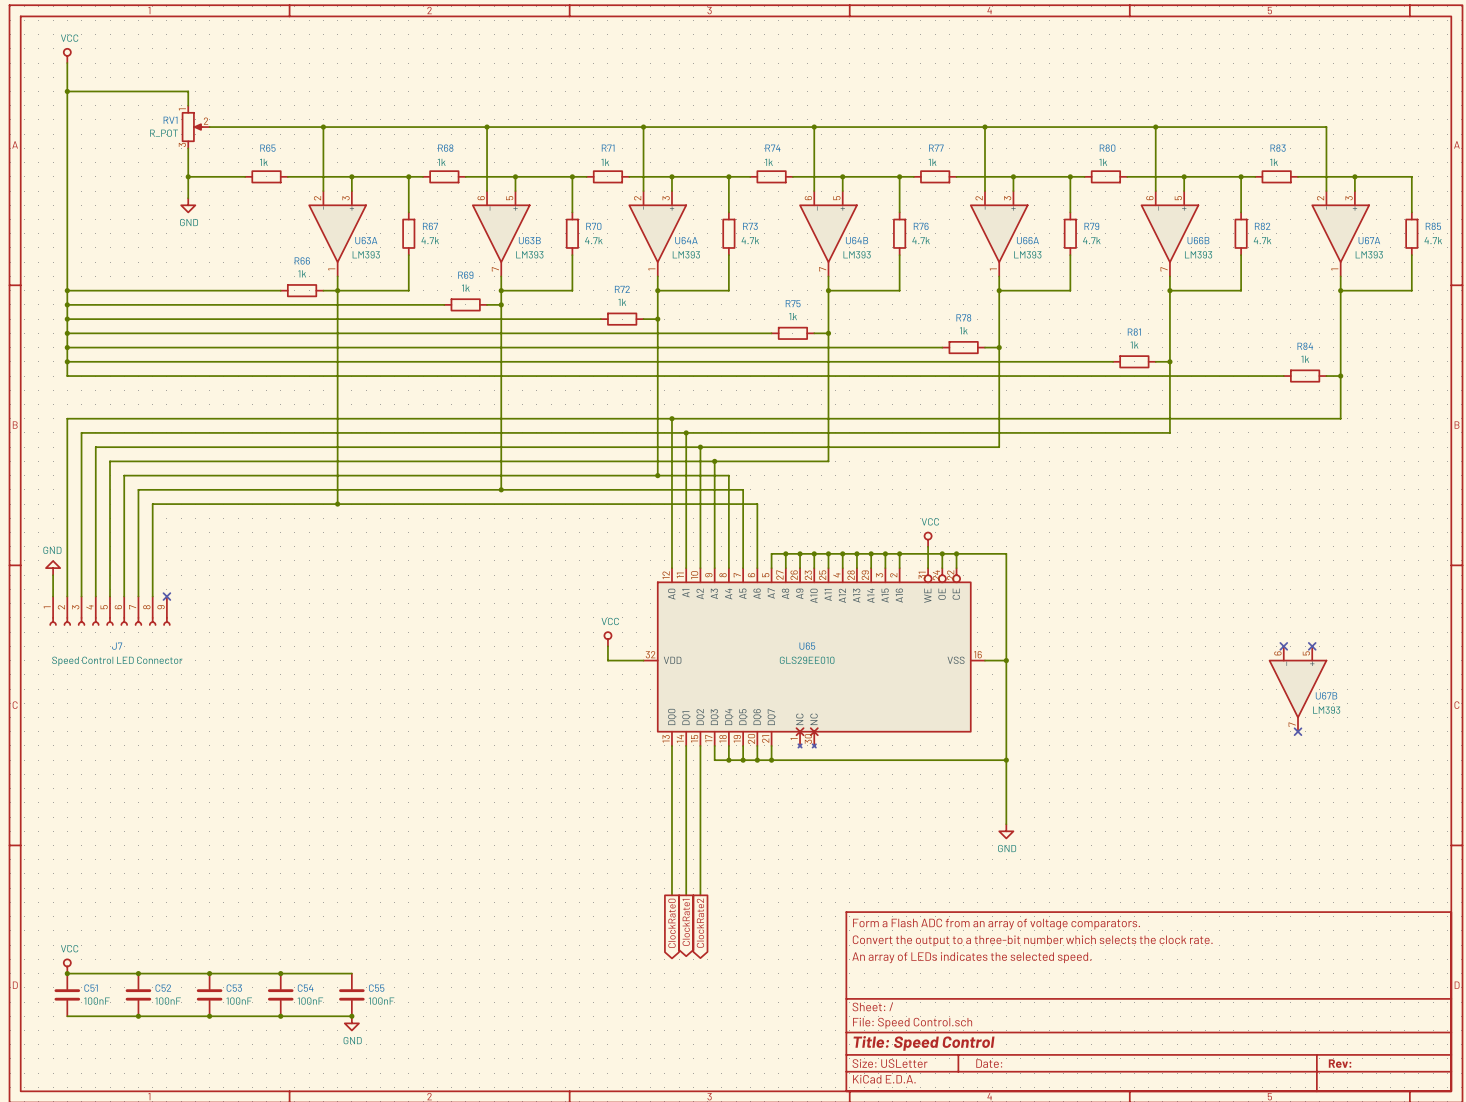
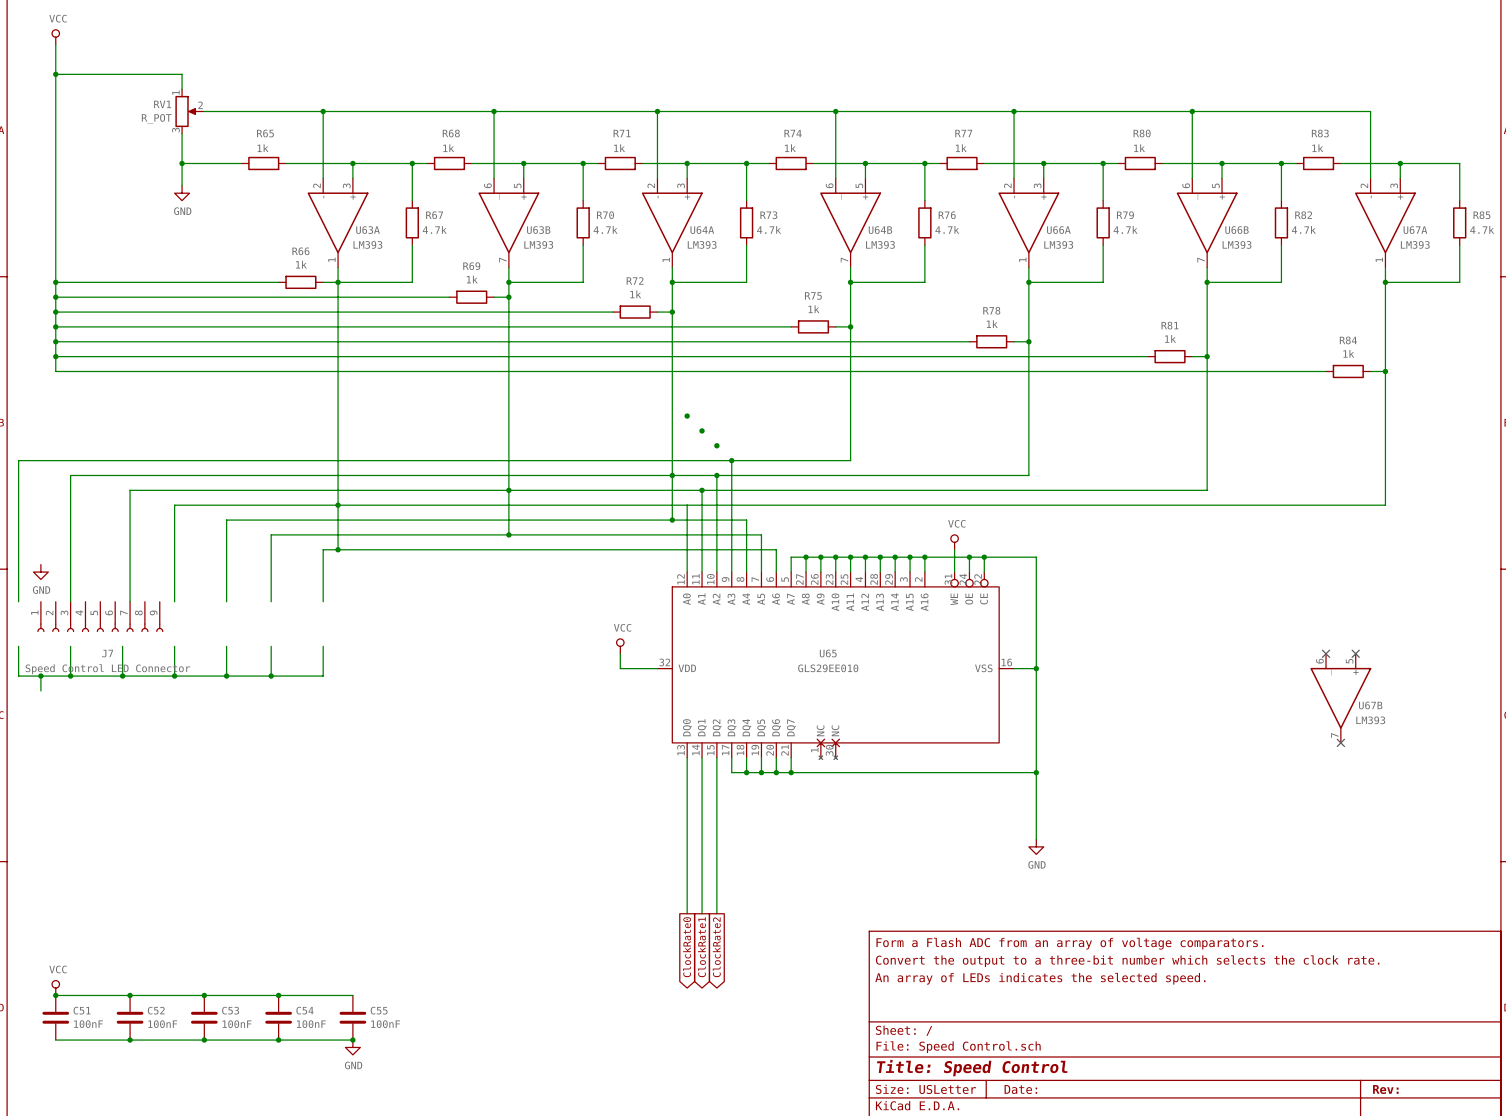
wire: (671, 418) (671, 504) -> none
wire: (1340, 418) (67, 418) (67, 596) -> (1385, 416) (1385, 505) (776, 505)
wire: (686, 432) (686, 489) -> none
wire: (1169, 432) (81, 432) (81, 475) -> none
wire: (700, 447) (700, 475) -> none
wire: (999, 447) (95, 447) (95, 596) -> none
wire: (110, 461) (110, 596) -> (100, 460) (18, 460) (18, 601)
wire: (124, 475) (124, 596) -> (115, 475) (70, 475)
wire: none -> (672, 475) (672, 520)
junction: none -> (716, 475)
wire: (728, 475) (728, 518) -> (746, 475) (1028, 475) (1028, 445)
wire: none -> (508, 490) (508, 534)
junction: none -> (702, 490)
wire: (743, 489) (743, 532) -> (761, 490) (1207, 490) (1207, 430)
wire: (181, 504) (152, 504) (152, 596) -> (174, 505) (174, 601)
wire: none -> (338, 505) (338, 549)
wire: (757, 504) (757, 546) -> (323, 601) (323, 549) (776, 549)
junction: none -> (672, 520)
wire: none -> (746, 520) (226, 520) (226, 601)
junction: none -> (508, 534)
wire: none -> (761, 534) (271, 534) (271, 601)
junction: none -> (338, 549)
power symbol rotation: 0° (53, 568) -> 180° (40, 572)
wire: (53, 575) (53, 596) -> none
no-connect mark: (166, 596) -> none
wire: none -> (18, 646) (18, 676) (323, 676) (323, 646)
wire: none -> (70, 646) (70, 676)
wire: none -> (122, 646) (122, 676)
wire: none -> (174, 646) (174, 676)
wire: none -> (226, 646) (226, 676)
wire: none -> (271, 646) (271, 676)
wire: none -> (40, 676) (40, 690)
junction: none -> (40, 676)
junction: none -> (70, 676)
junction: none -> (122, 676)
junction: none -> (174, 676)
junction: none -> (226, 676)
junction: none -> (271, 676)

